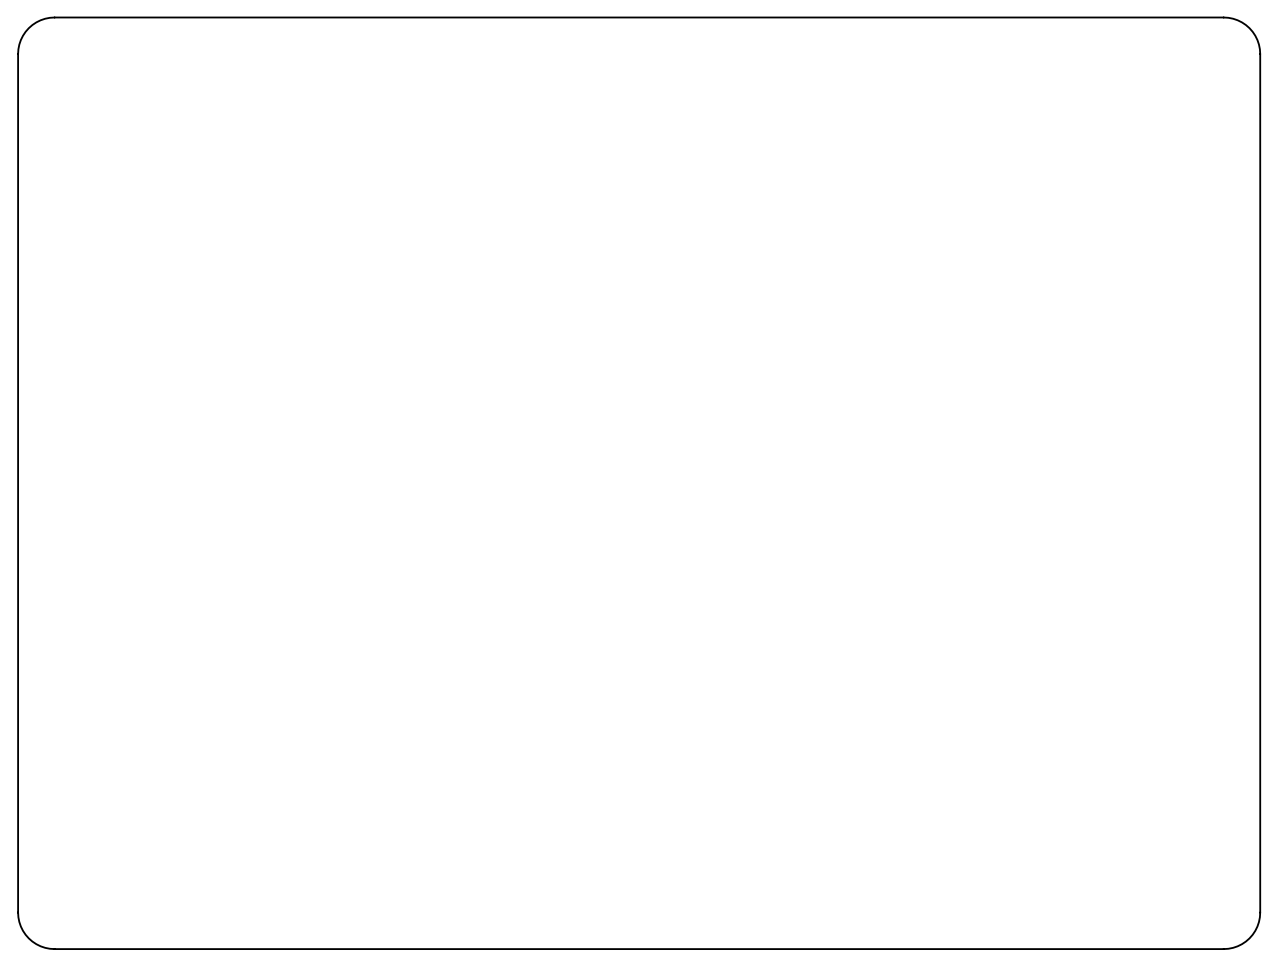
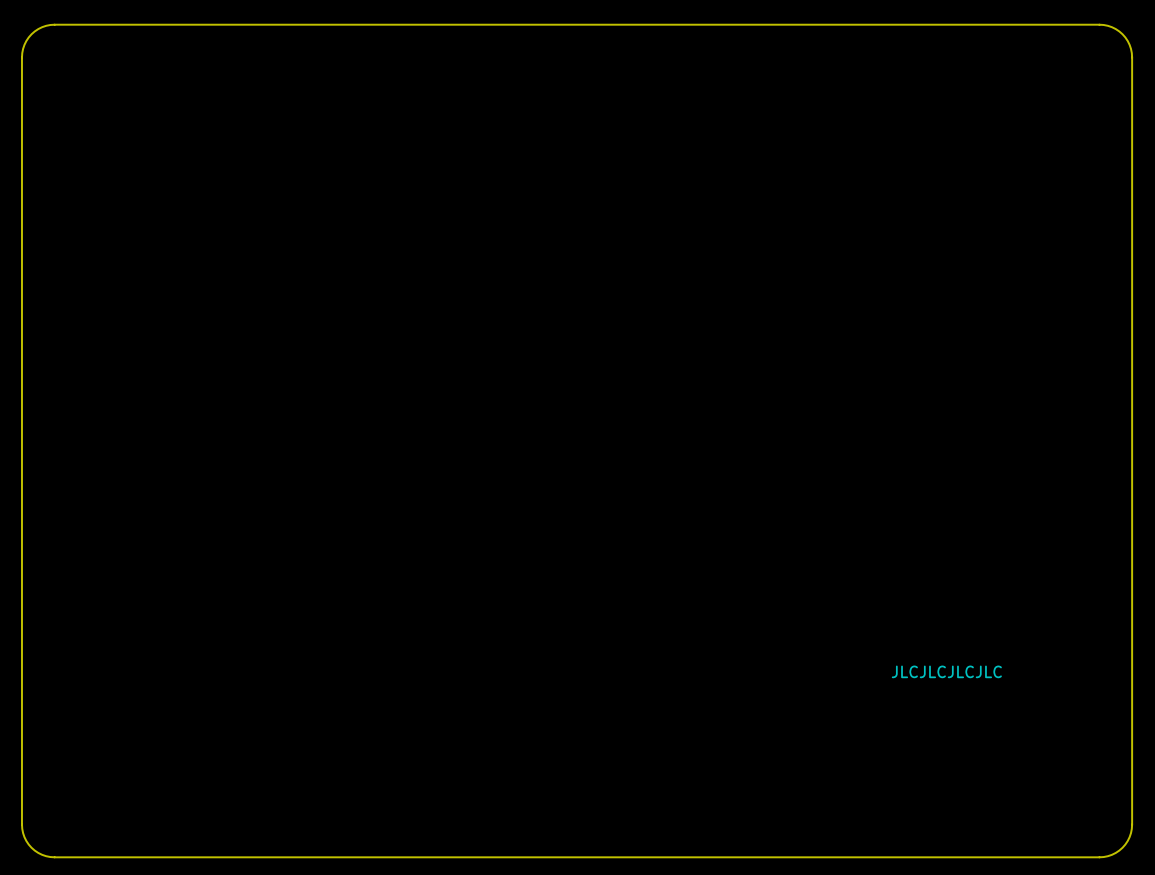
text: none -> JLCJLCJLCJLC (946, 671)

